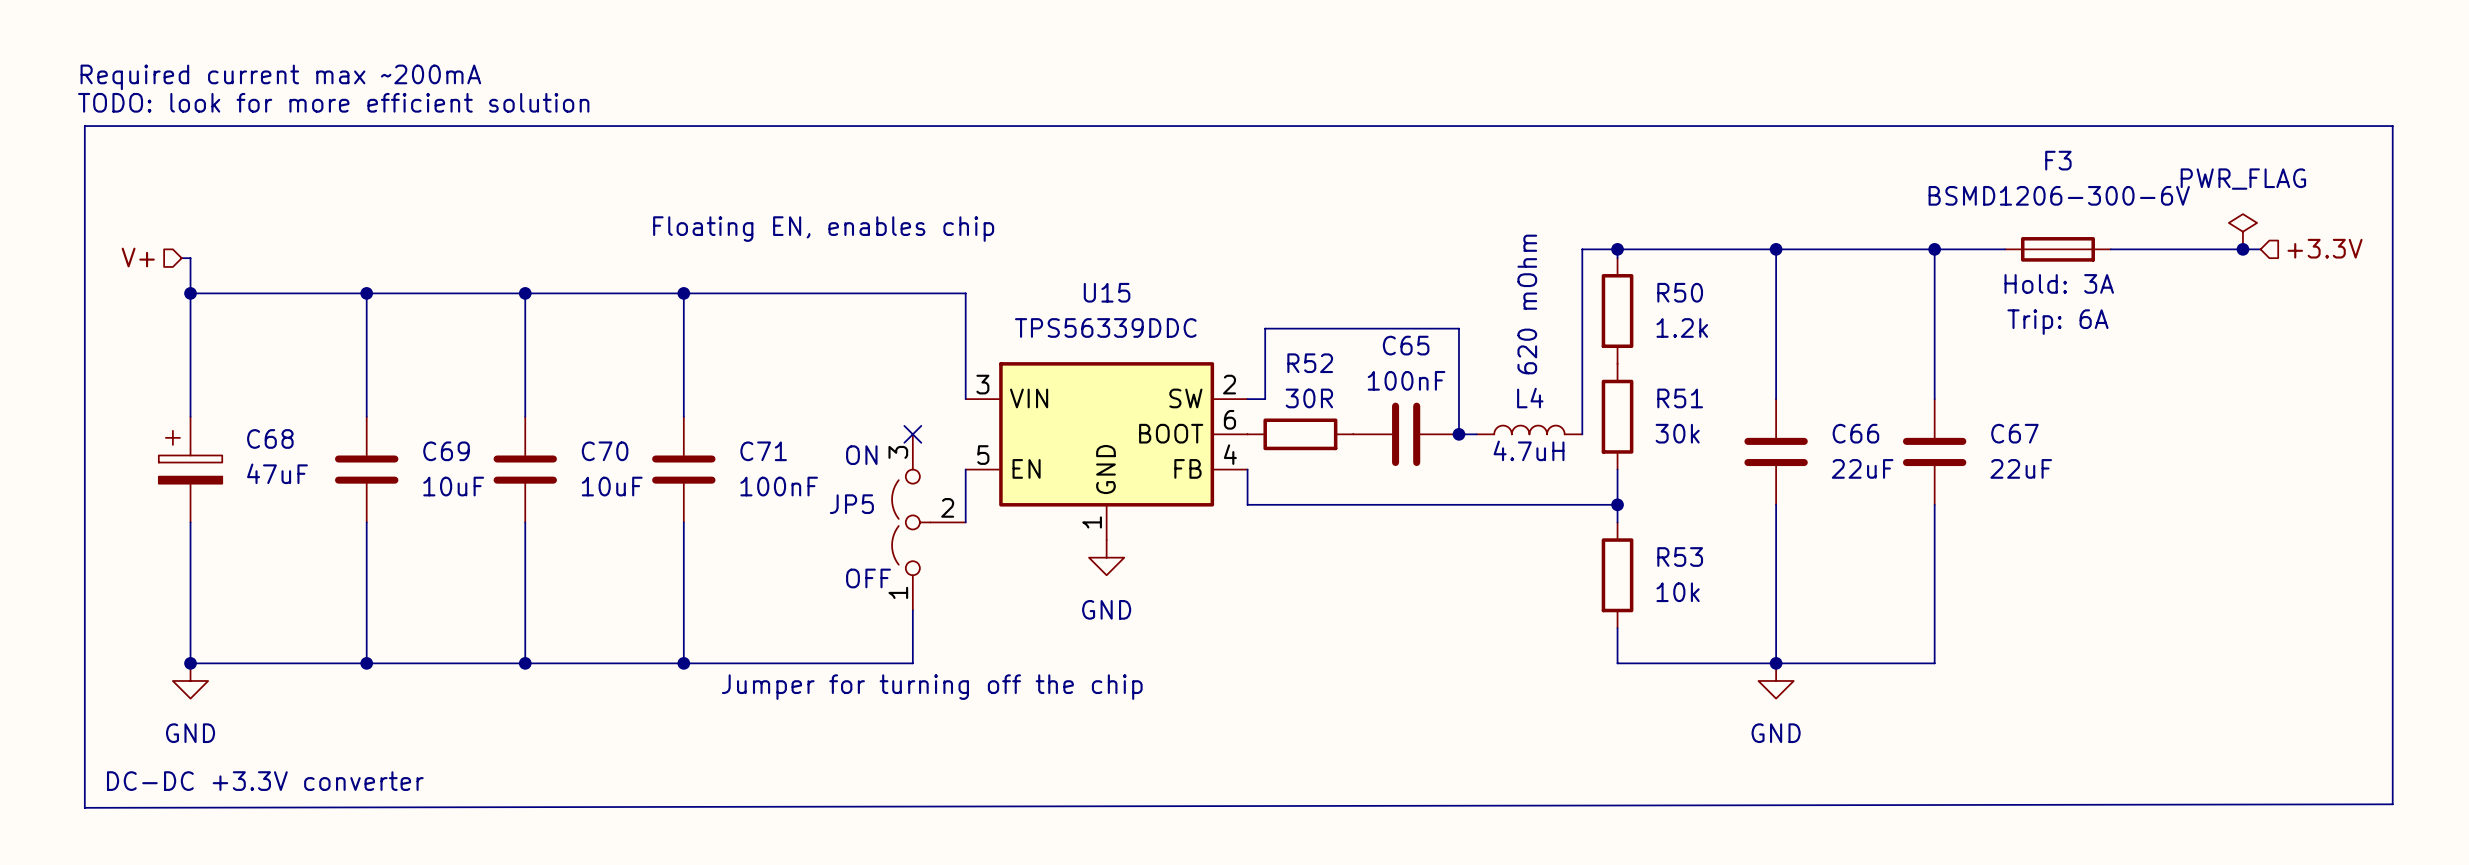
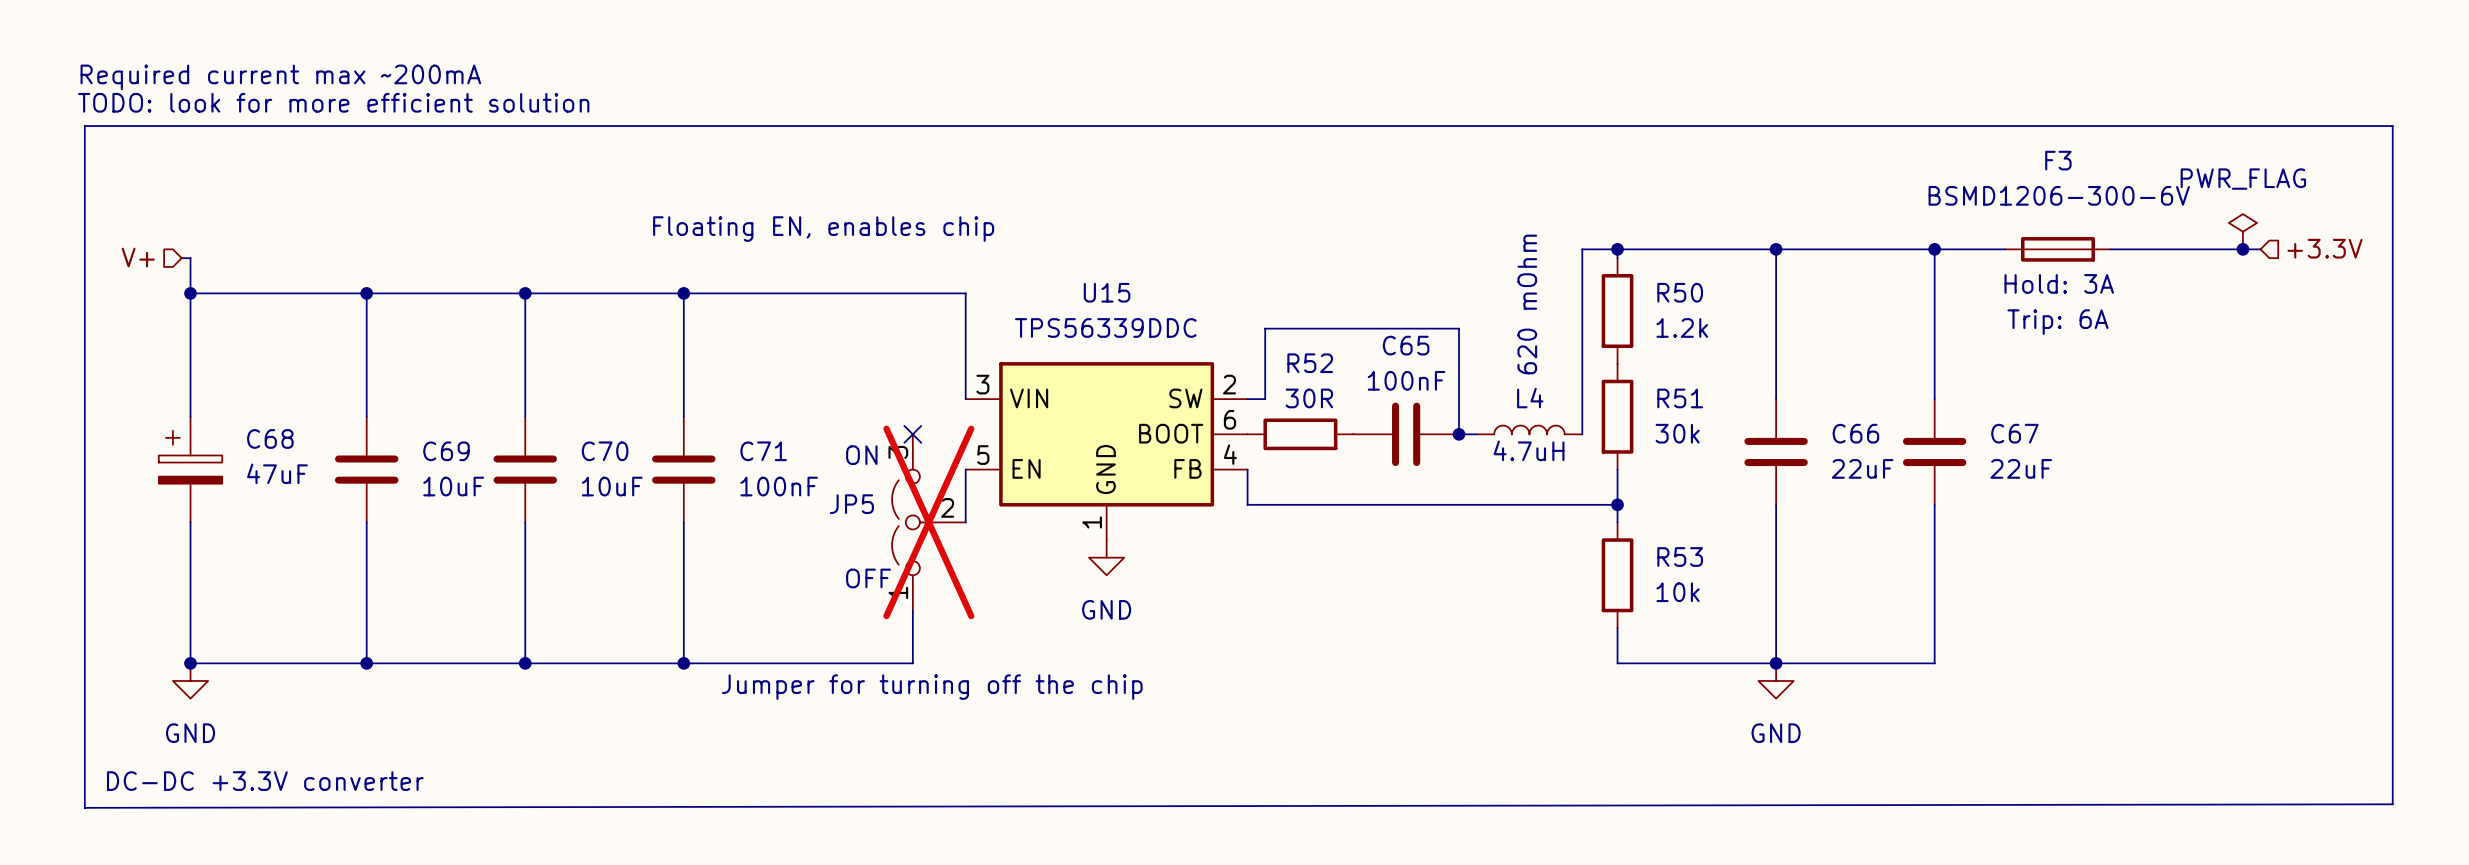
JP5 do-not-place cross: none -> (928, 522)

